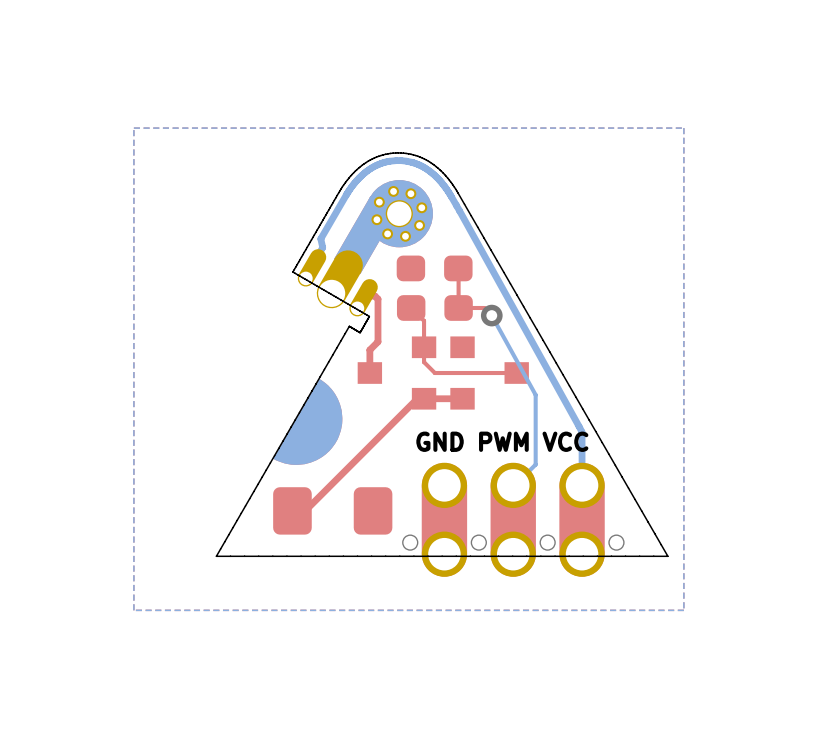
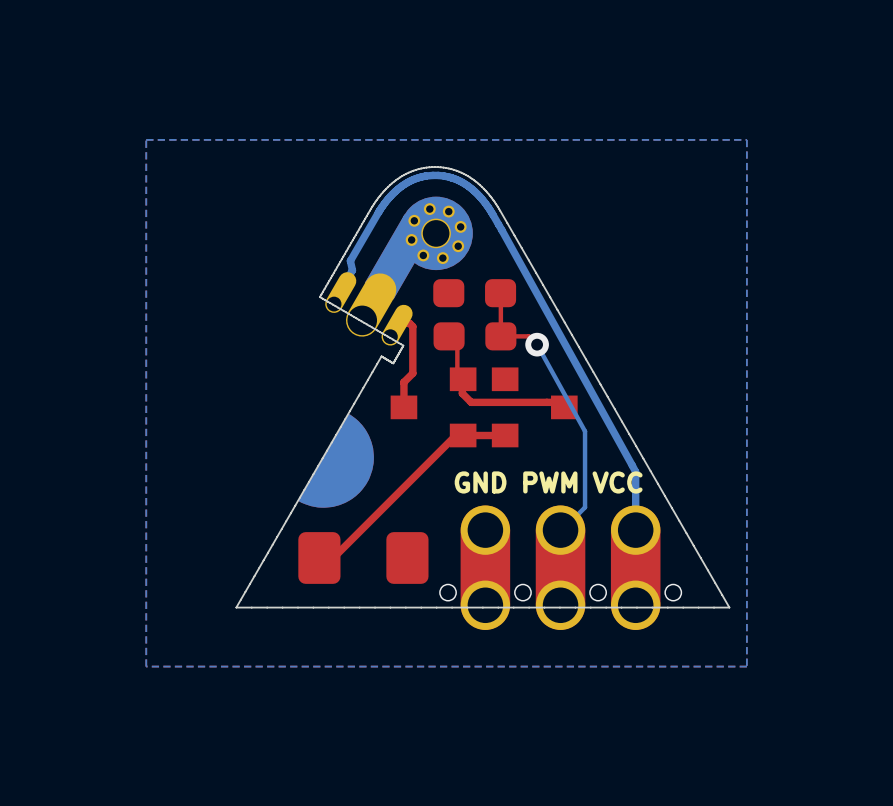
top track: none -> (457, 331) (457, 369) (462, 374) (462, 393) (471, 402) (563, 402)
top track: (411, 307) (424, 320) (424, 362) (434, 373) (516, 373) -> none

